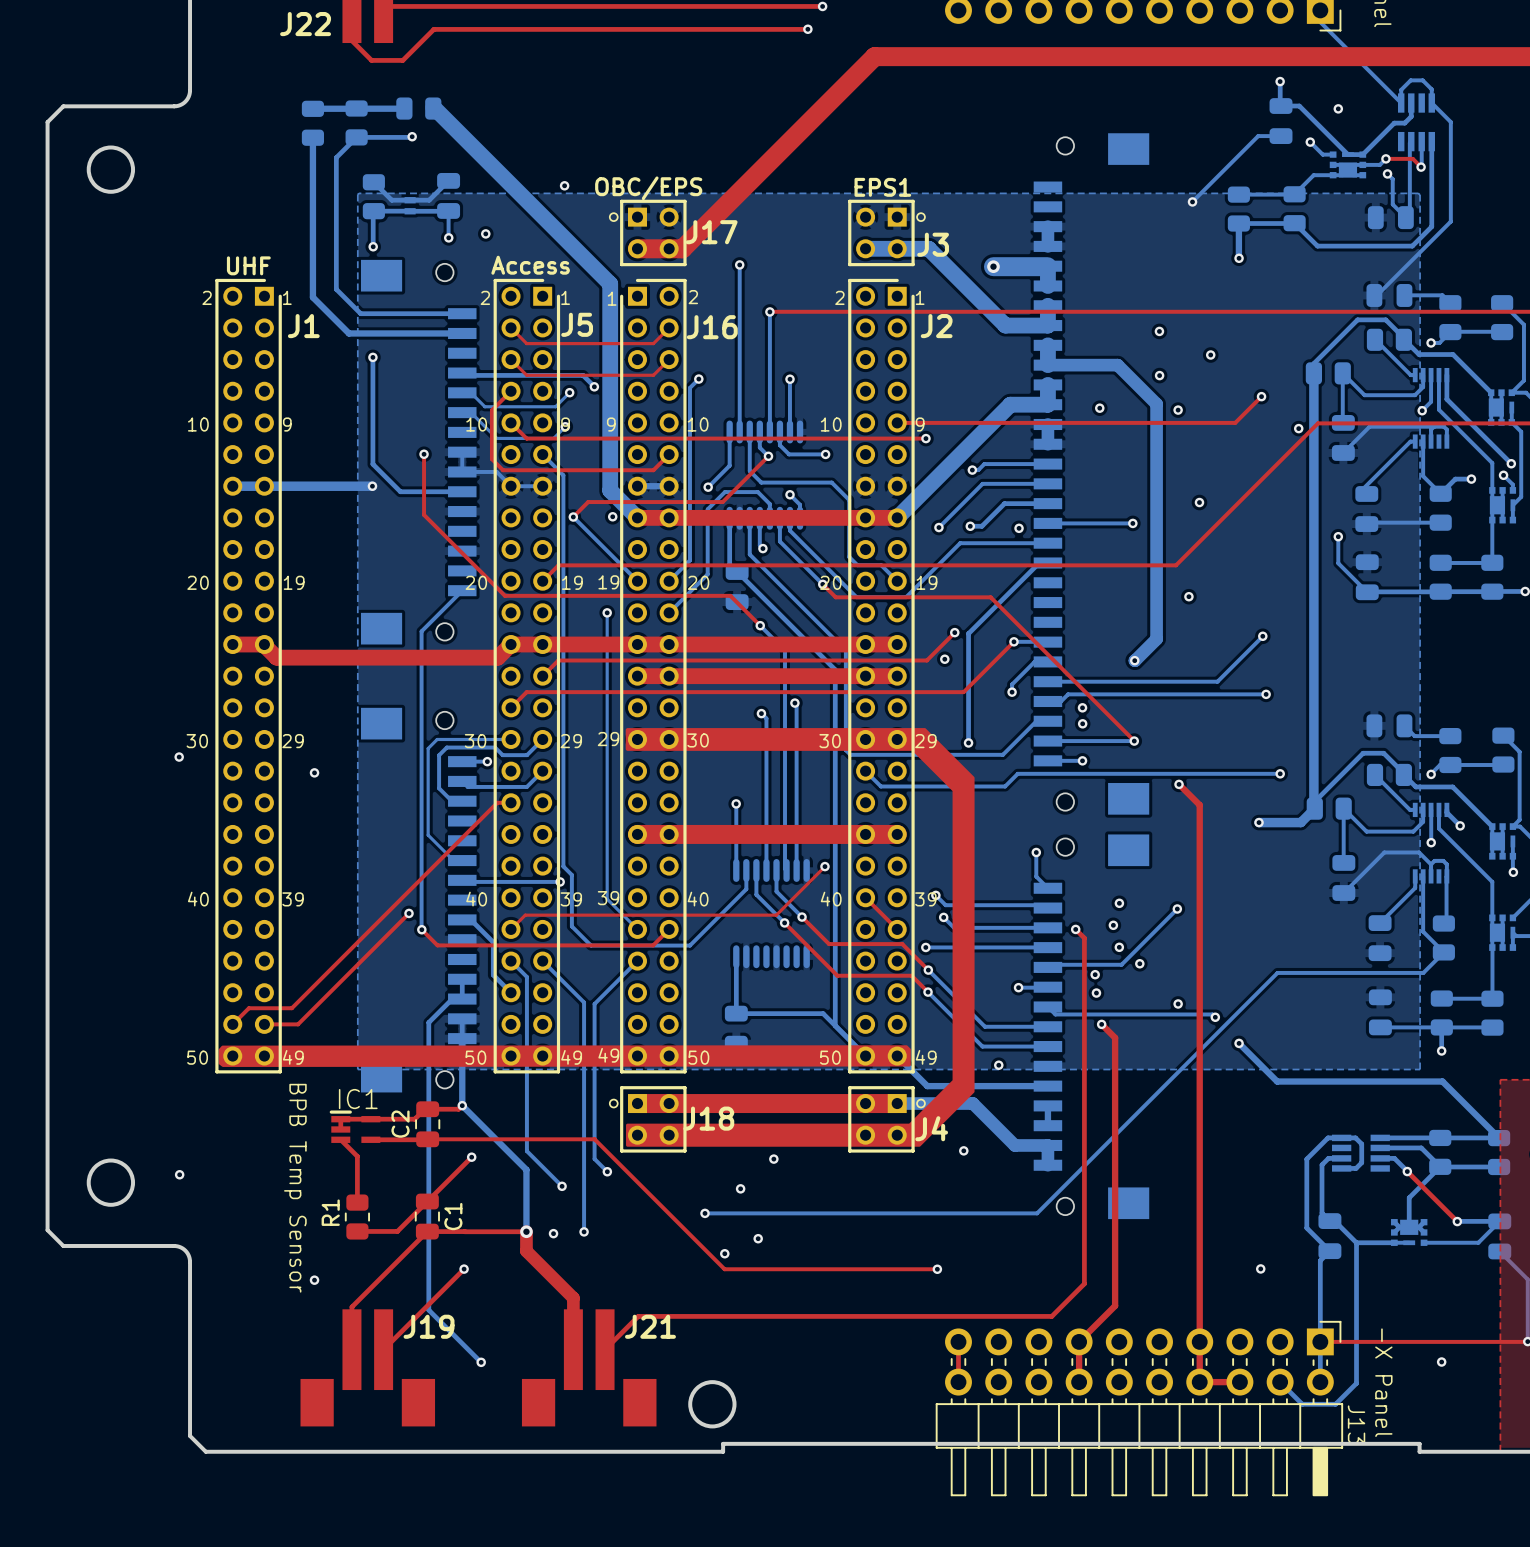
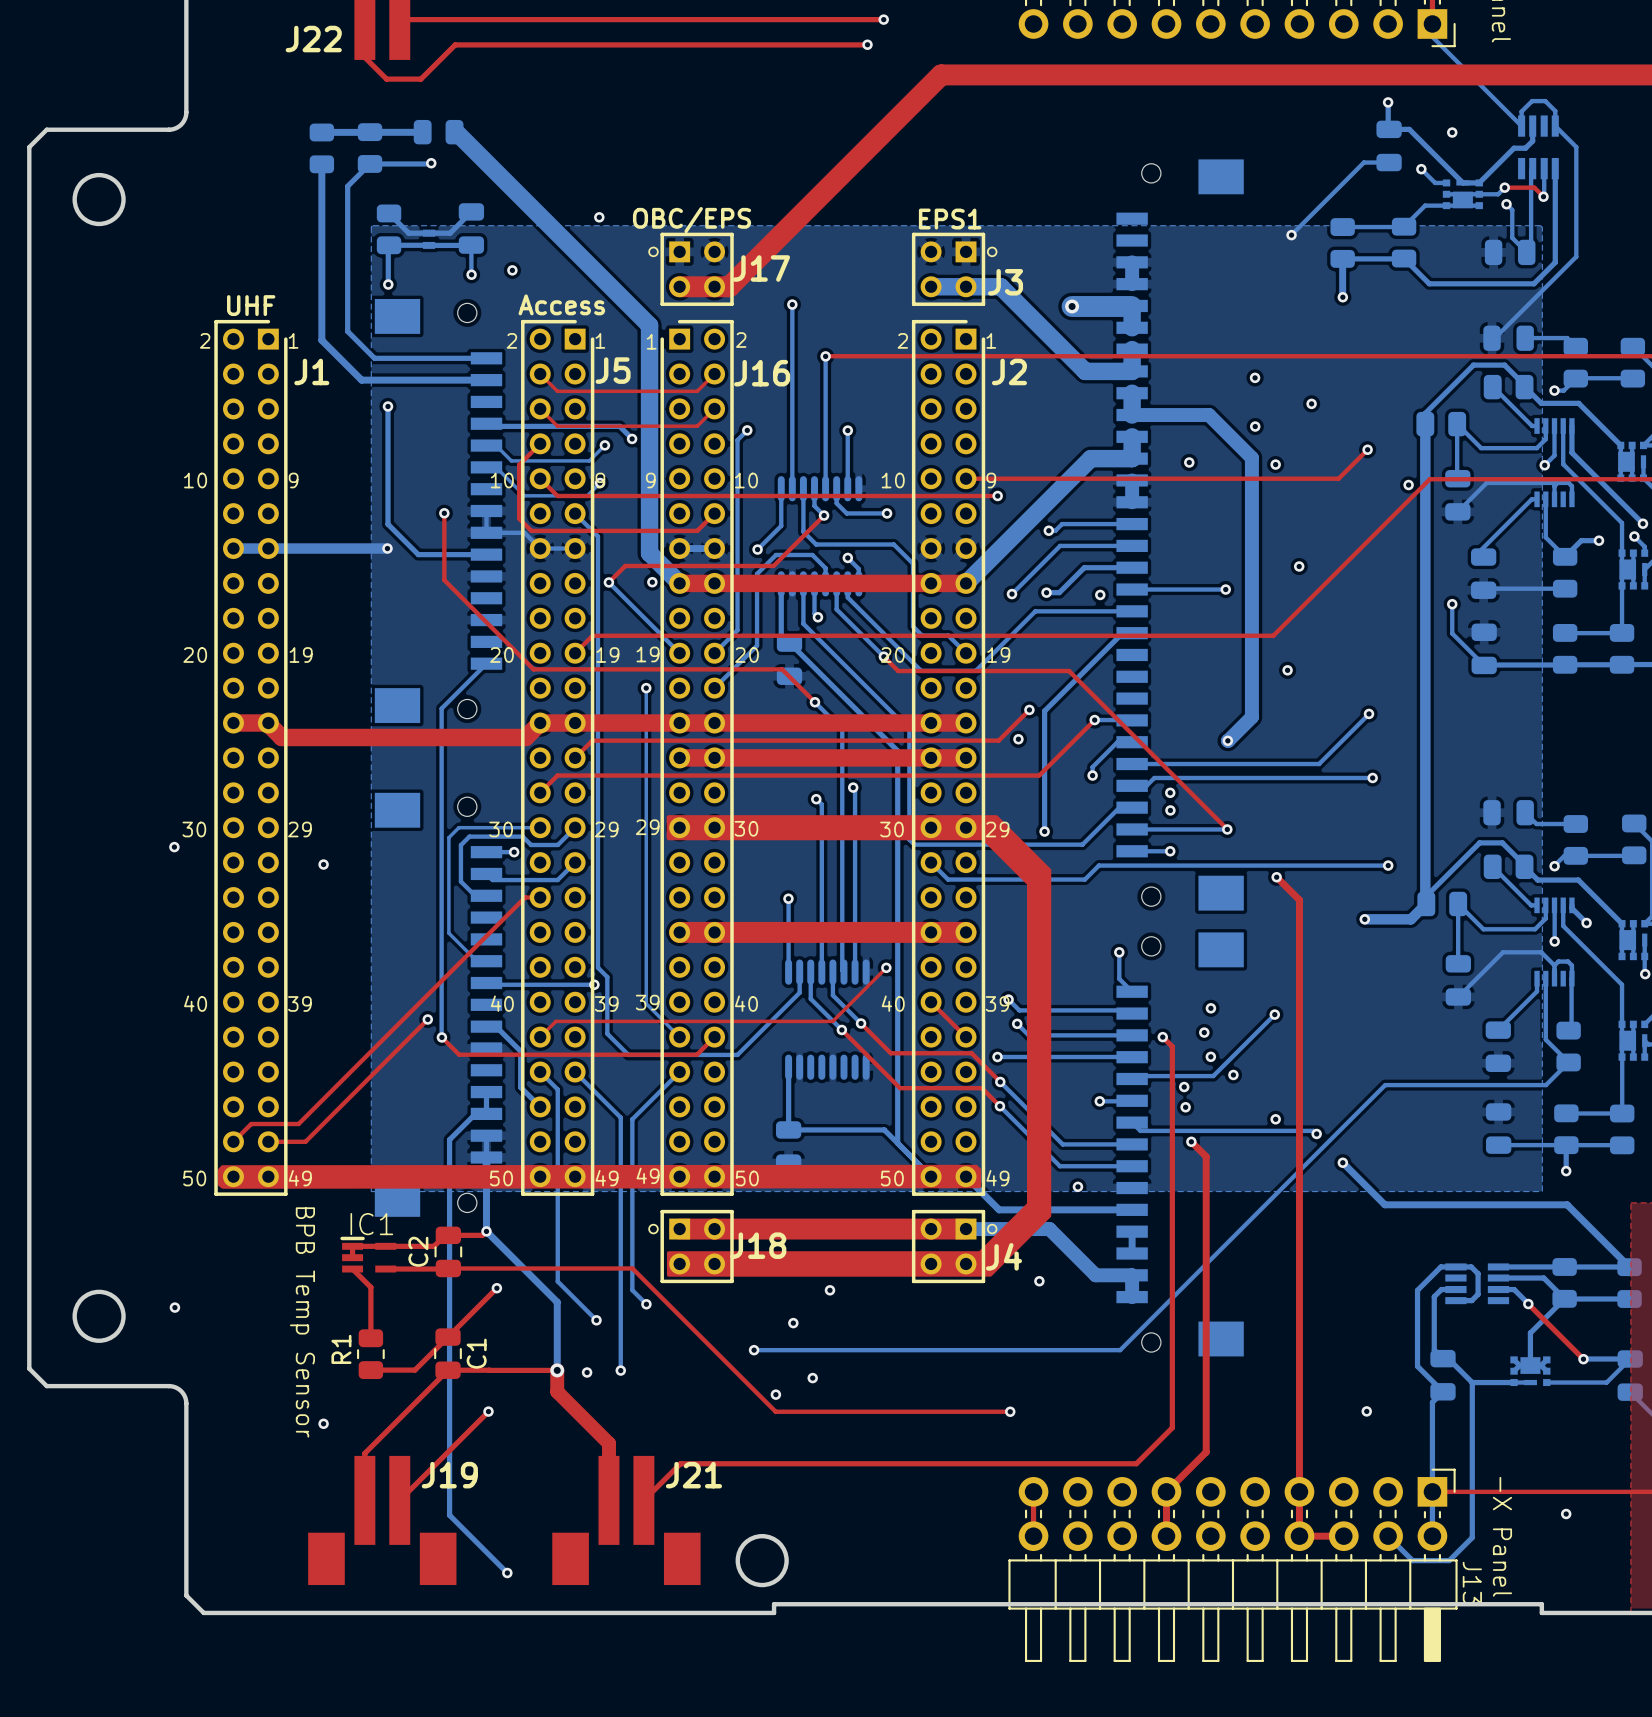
bottom track: (428, 1310) (481, 1362) -> (449, 1456) (449, 1515) (507, 1572)
via position: (481, 1362) -> (507, 1572)

